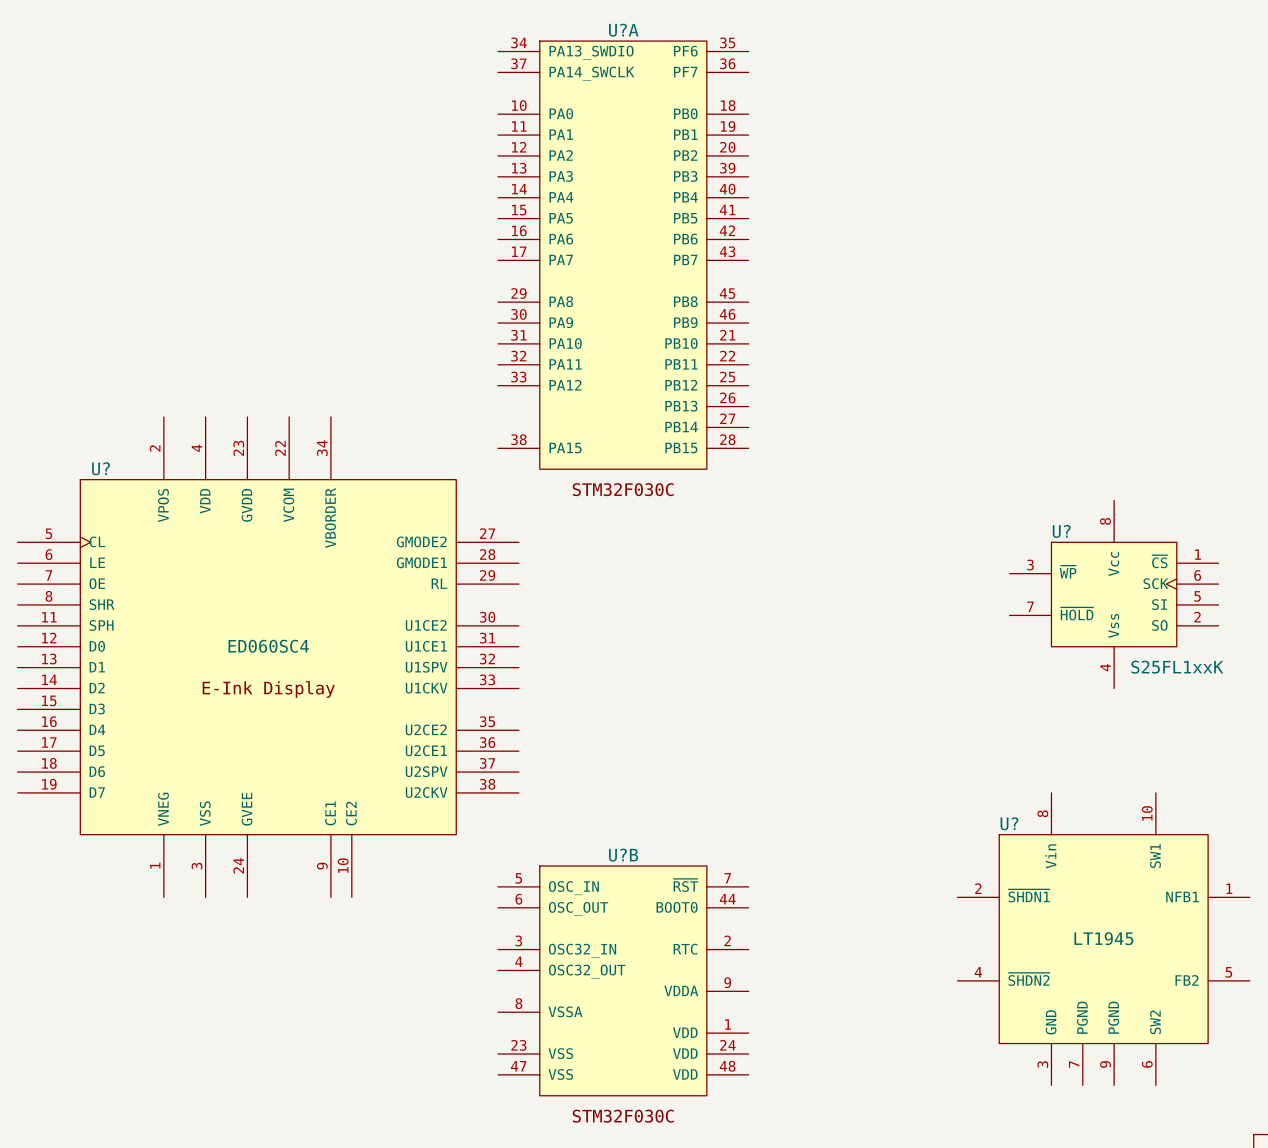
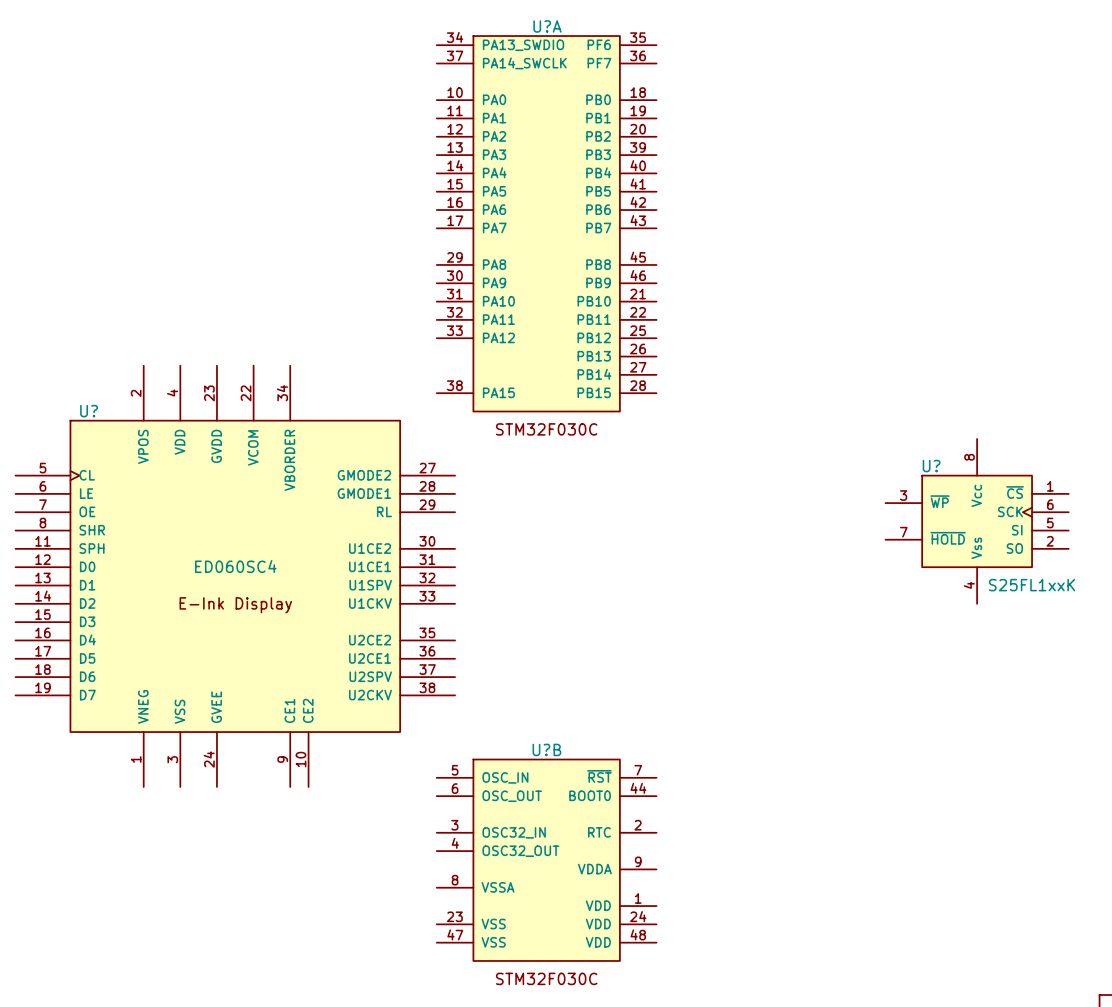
U?: LT1945 (1103, 939) -> none

